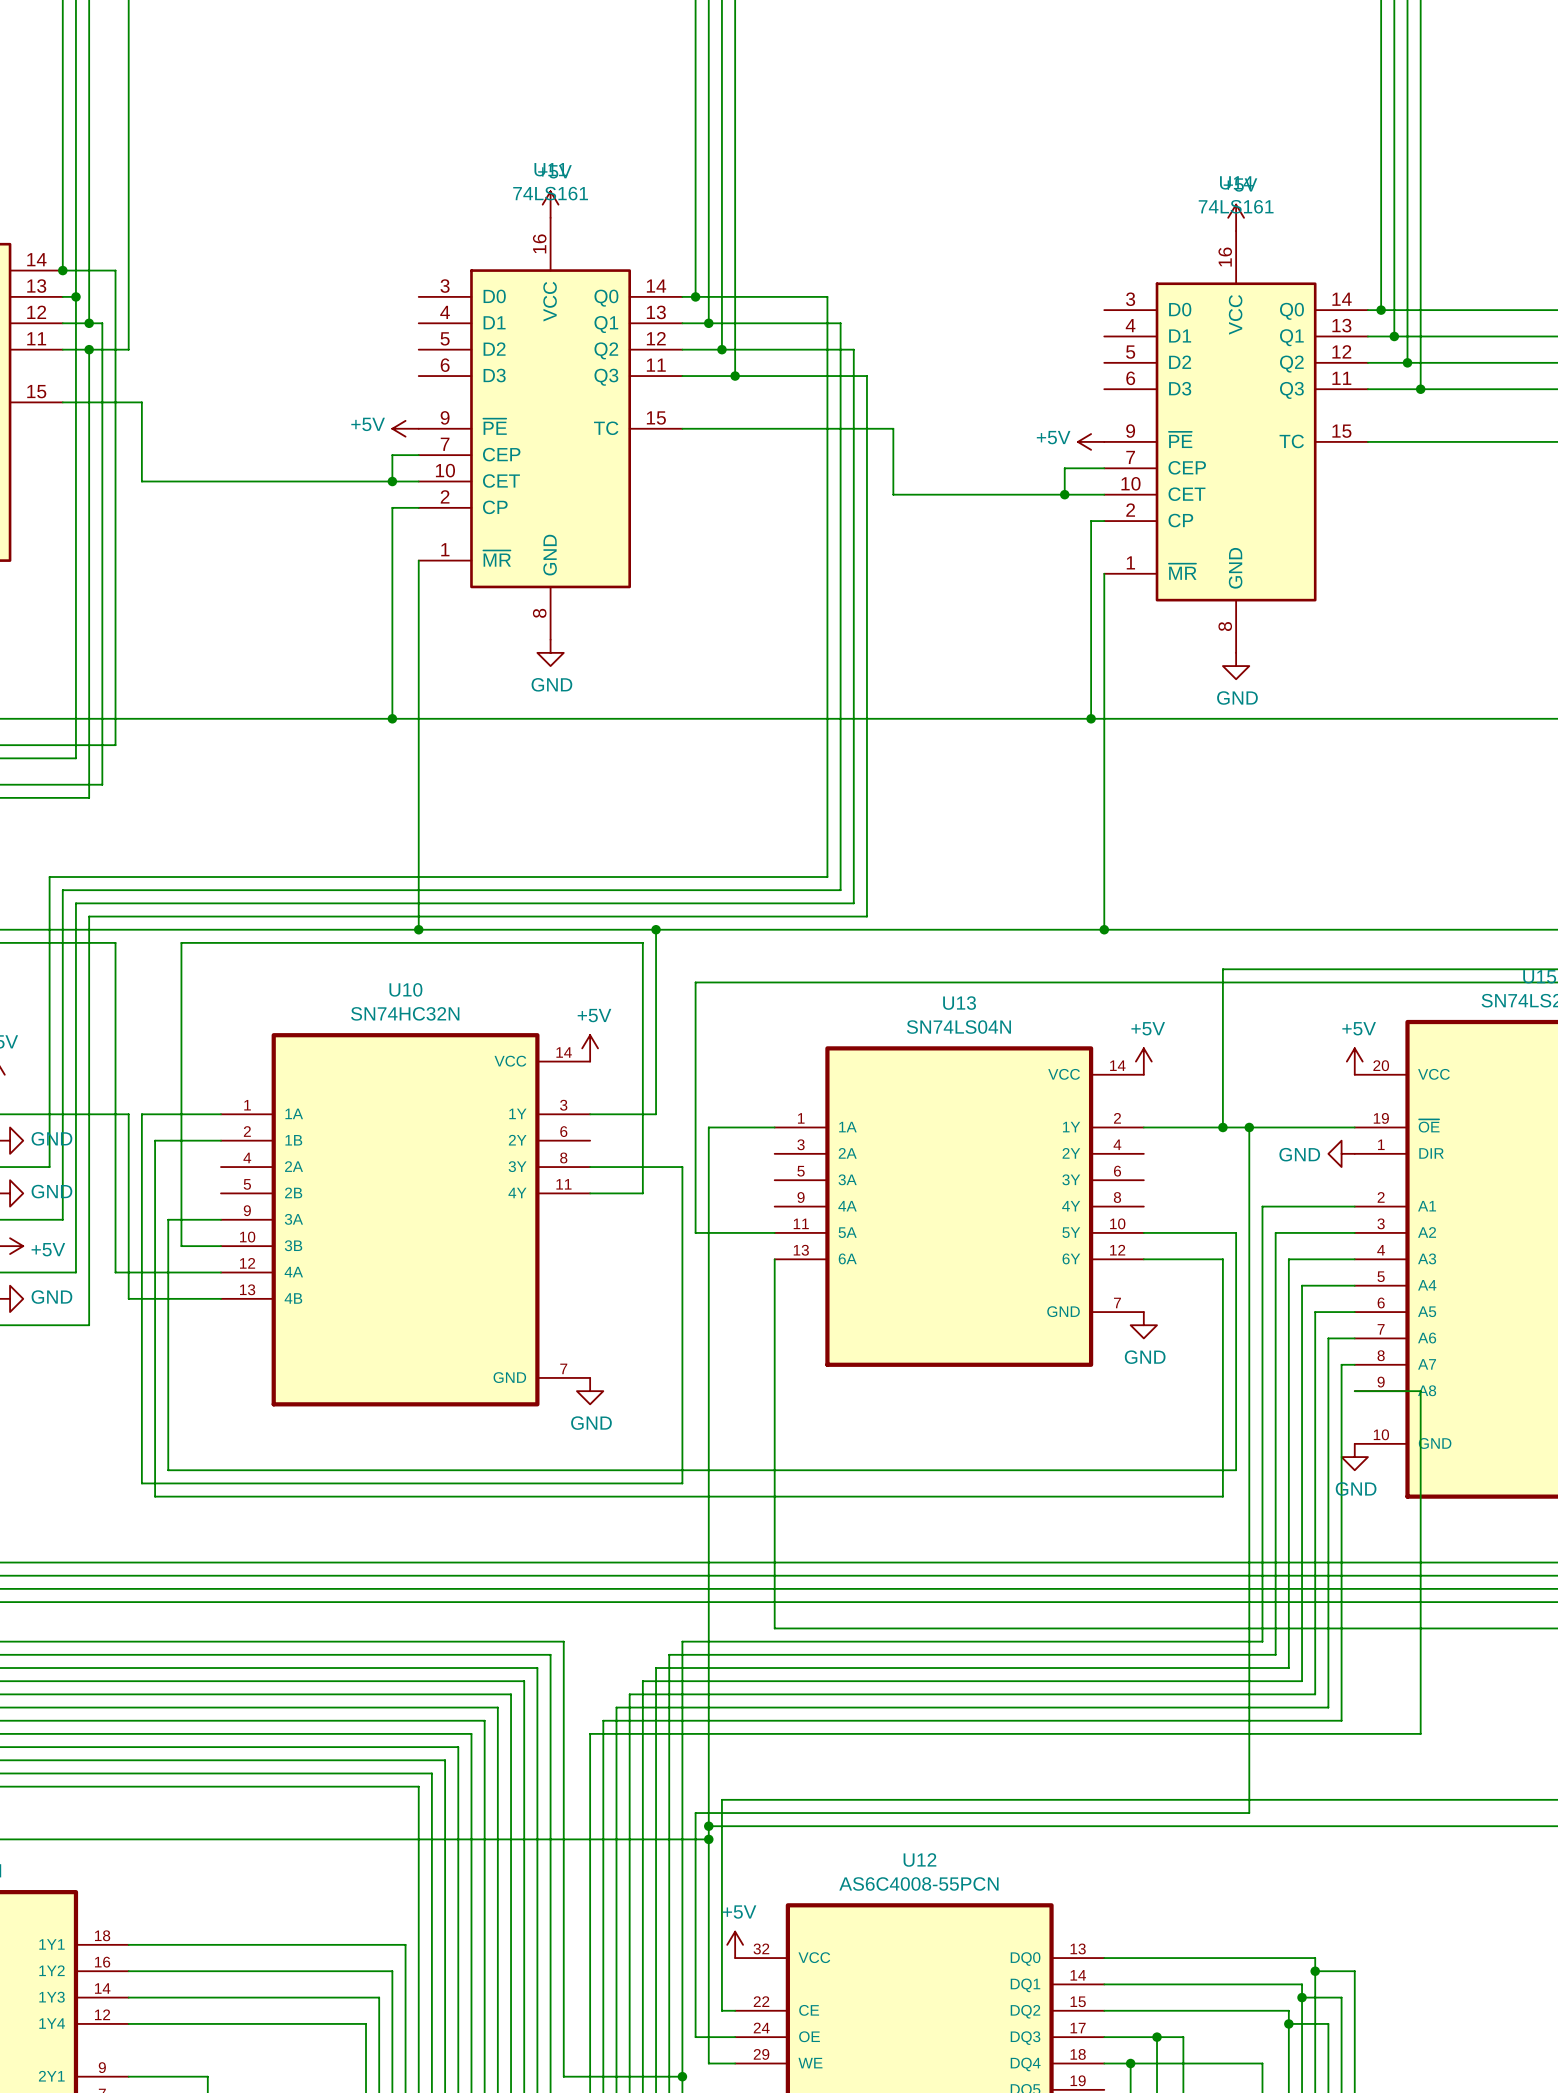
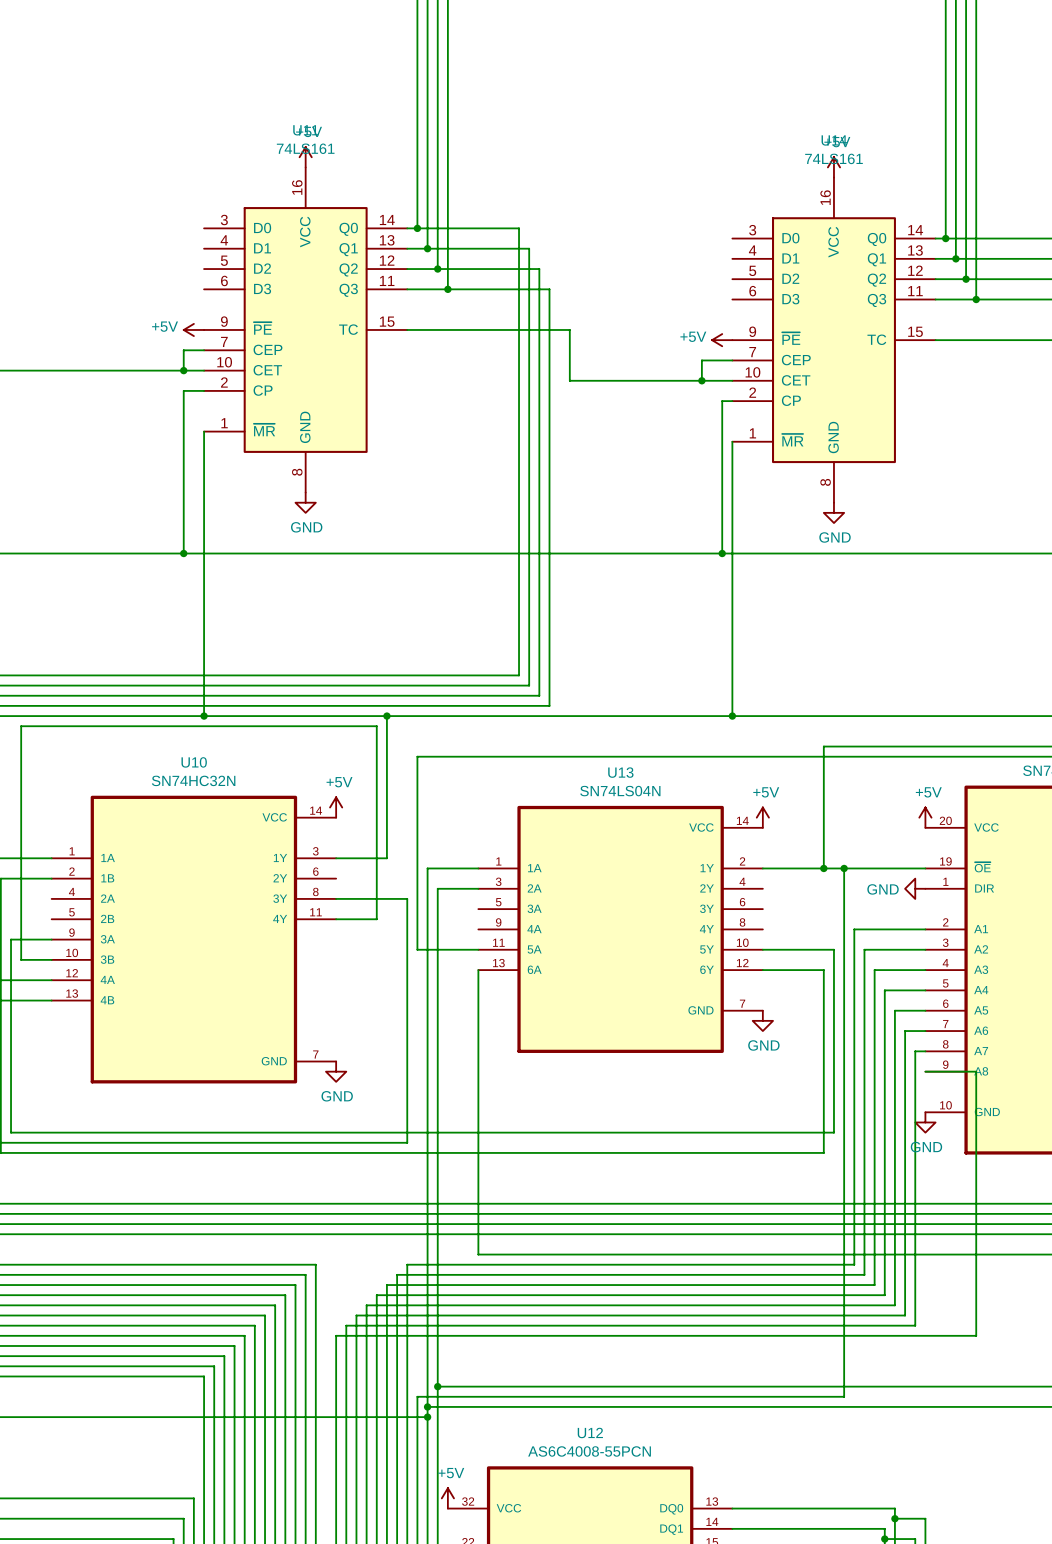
wire: none -> (478, 888) (437, 888) (437, 1386)
junction: none -> (437, 1386)

